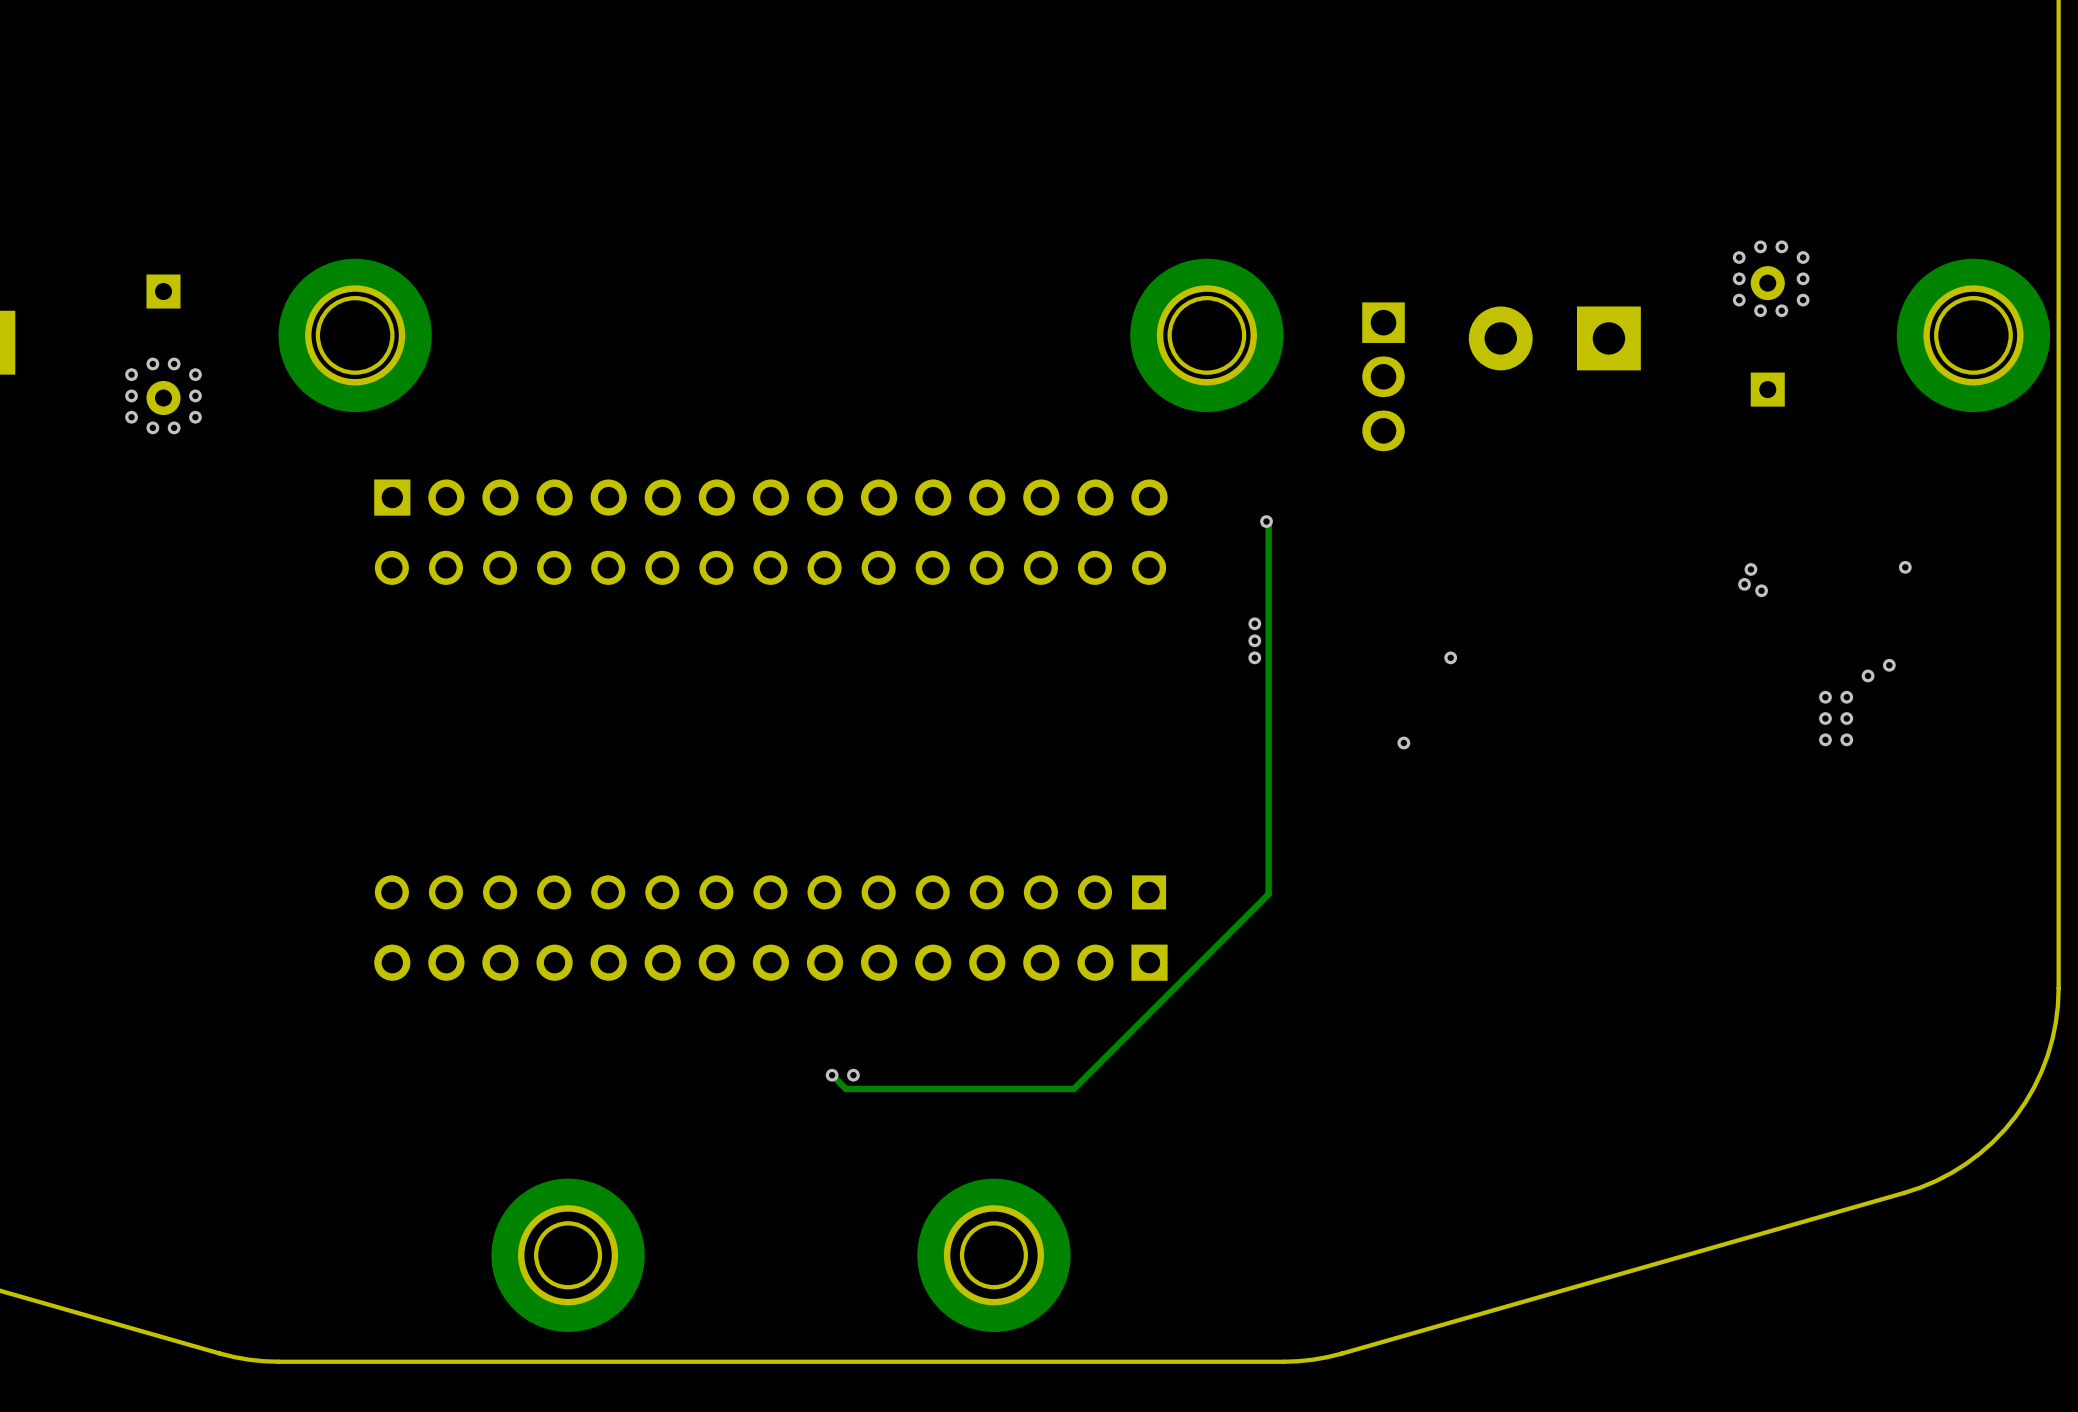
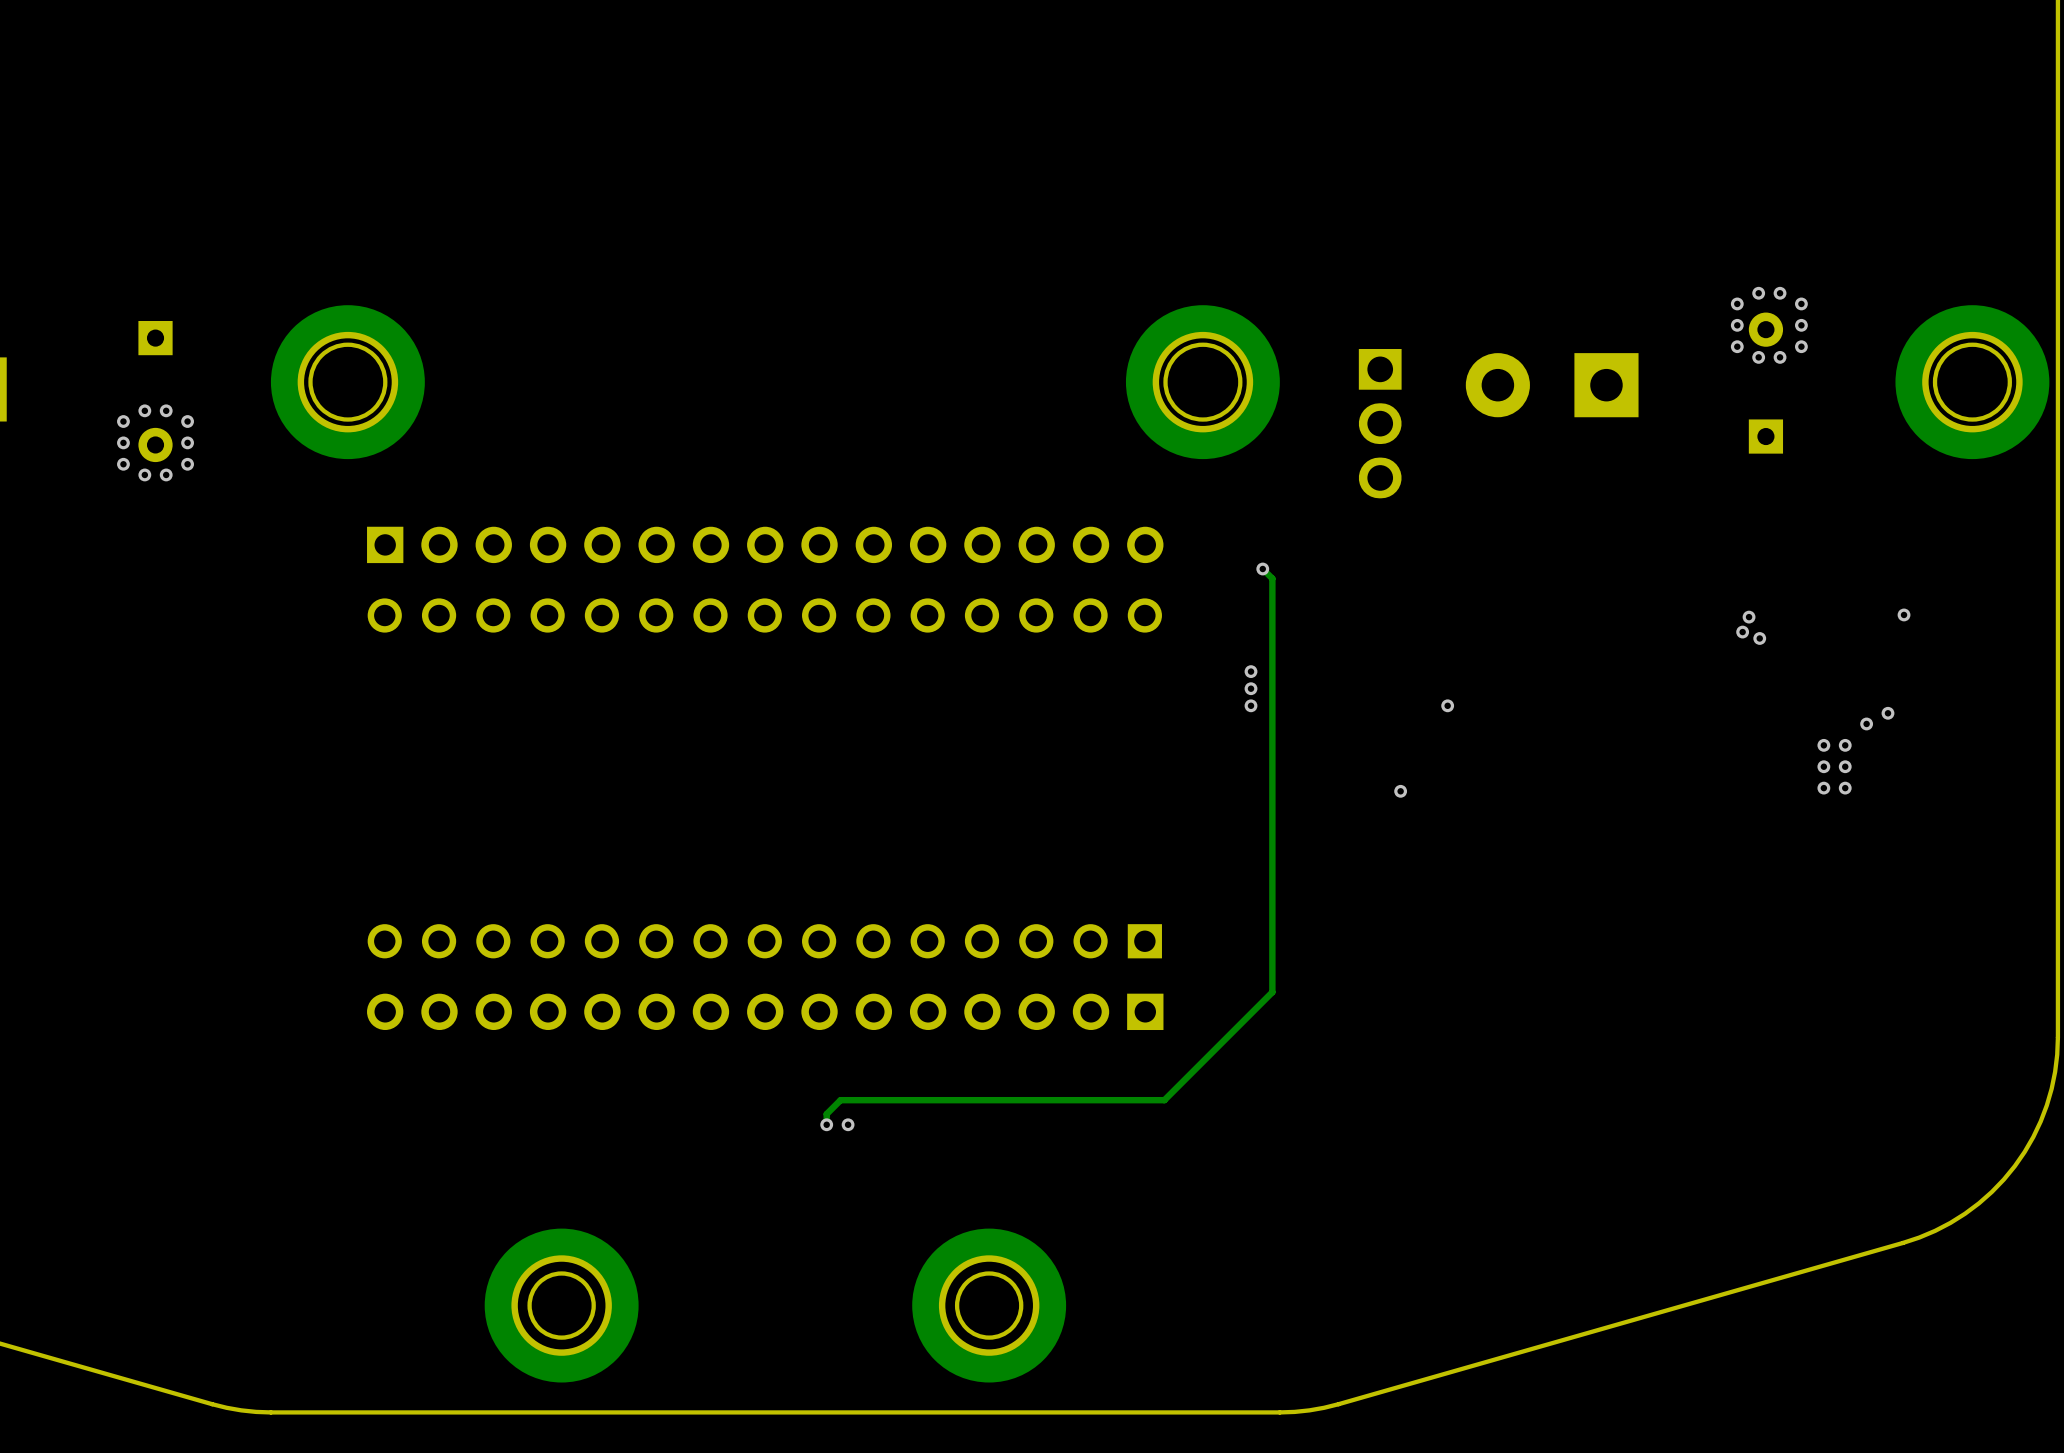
track: (1268, 523) (1268, 894) (1073, 1089) (845, 1089) (832, 1075) -> (1264, 571) (1272, 578) (1272, 992) (1164, 1100) (840, 1100) (826, 1114) (826, 1124)

